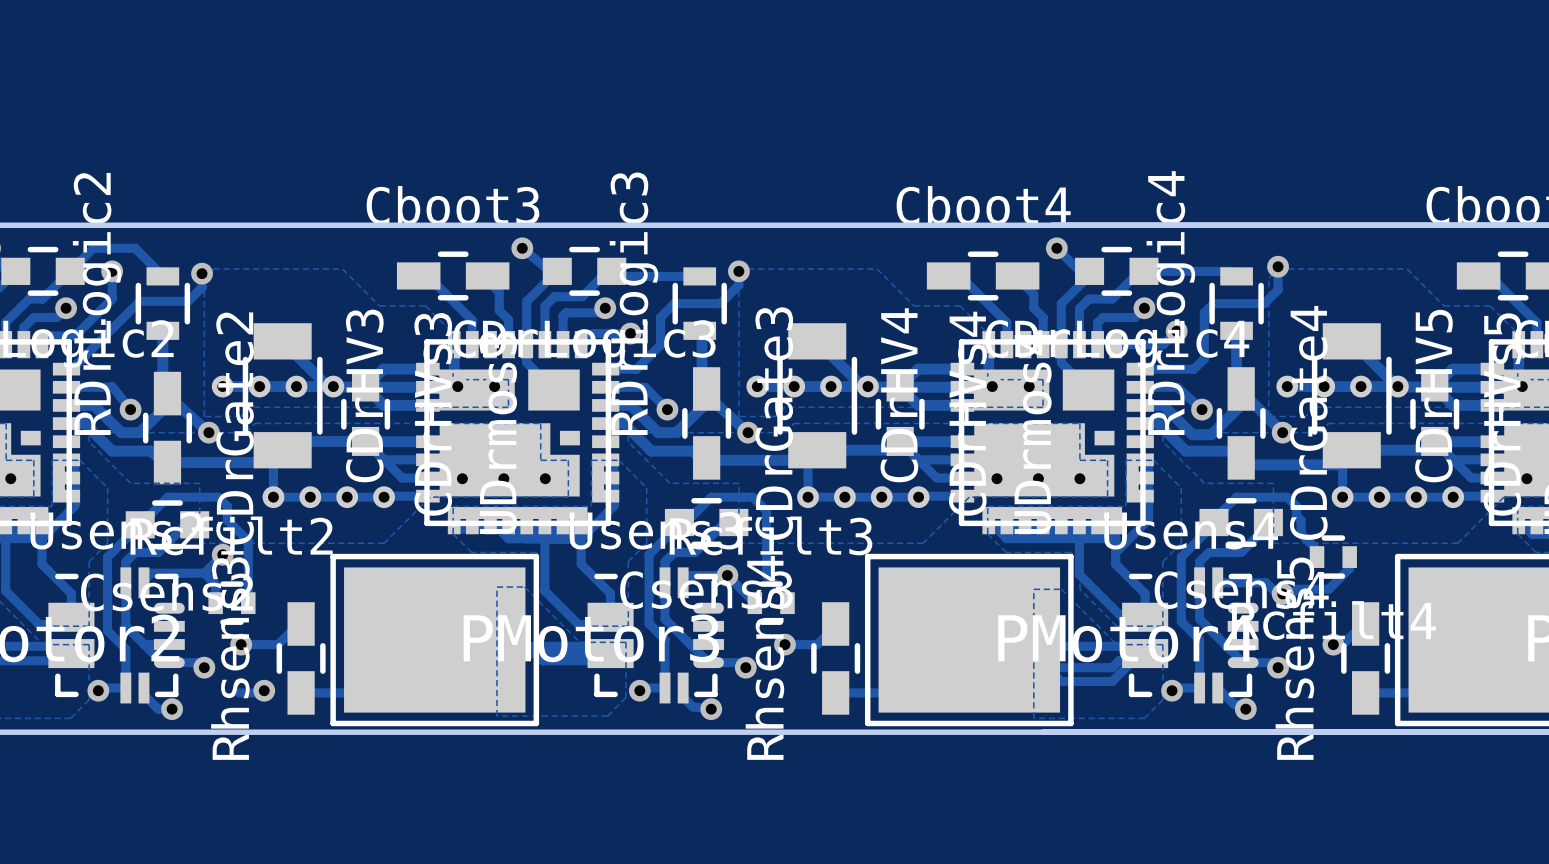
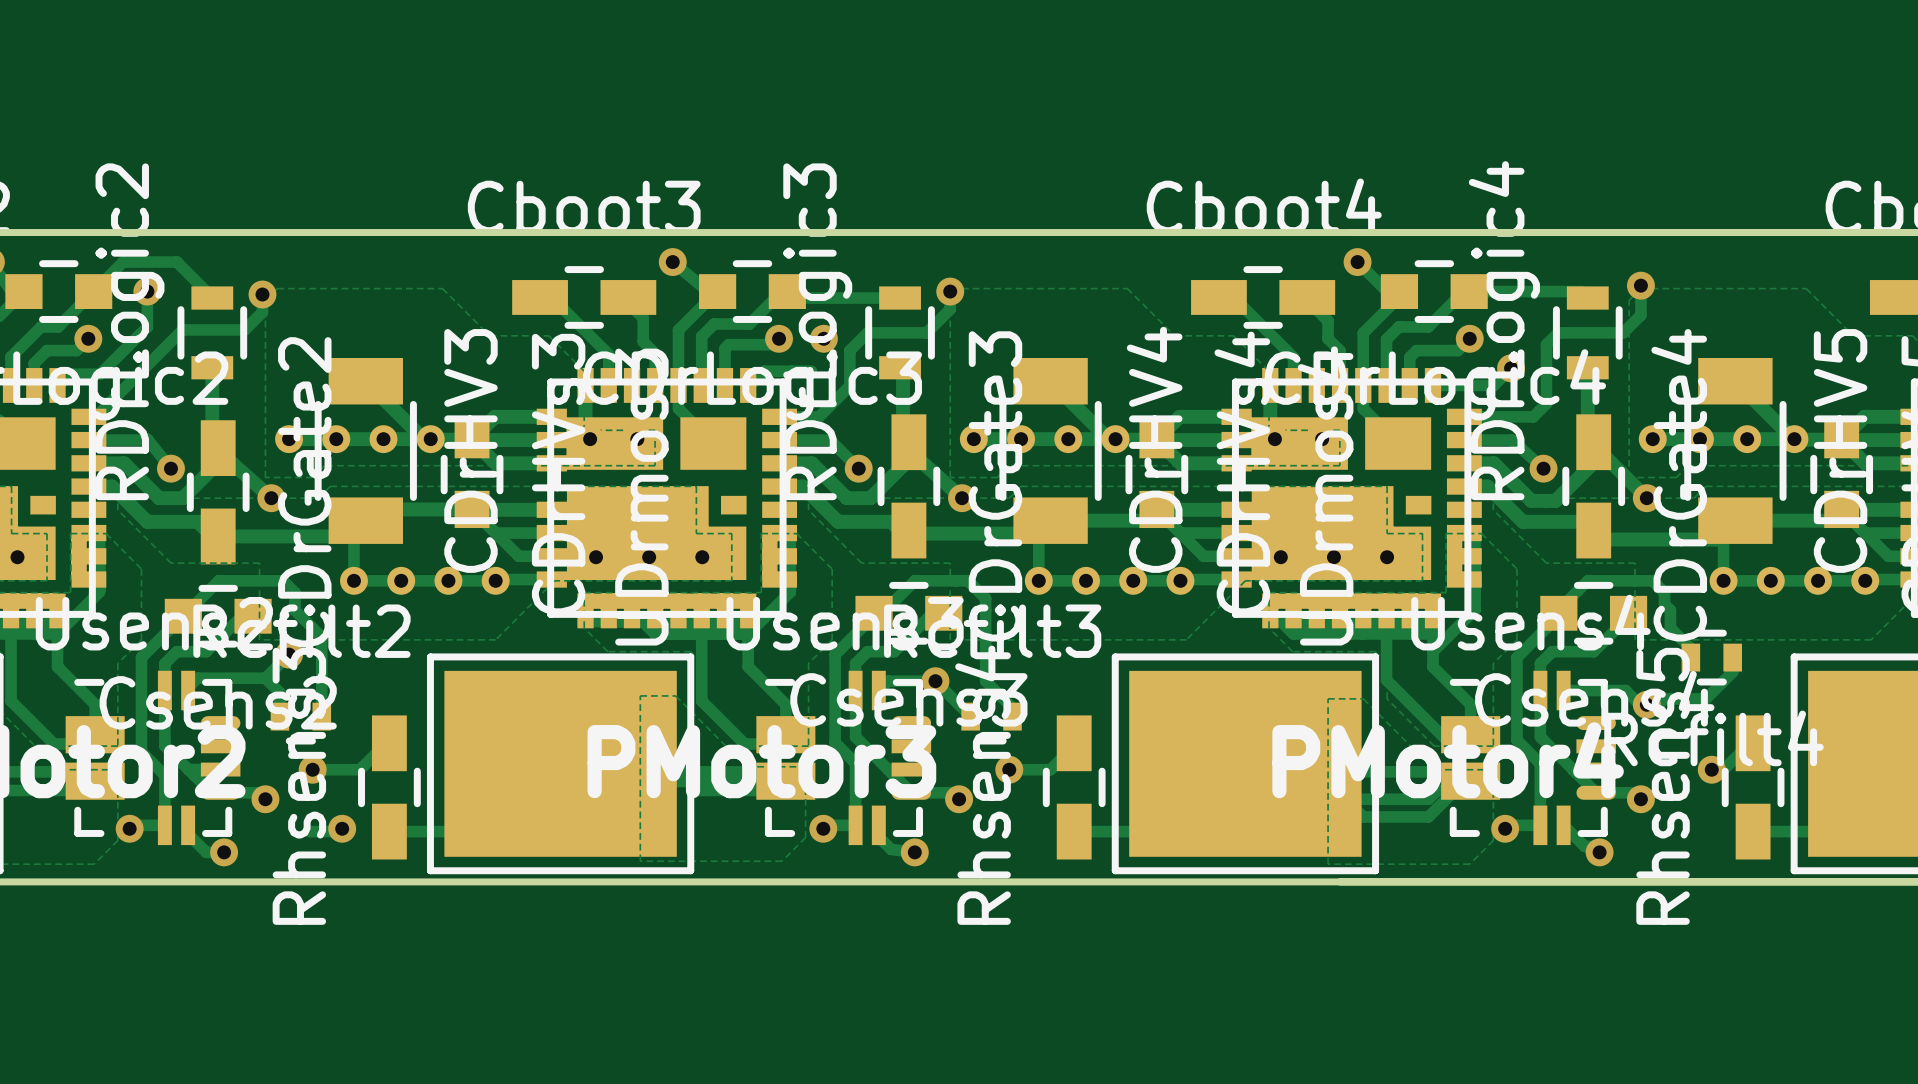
via position: (630, 333) -> (823, 338)

